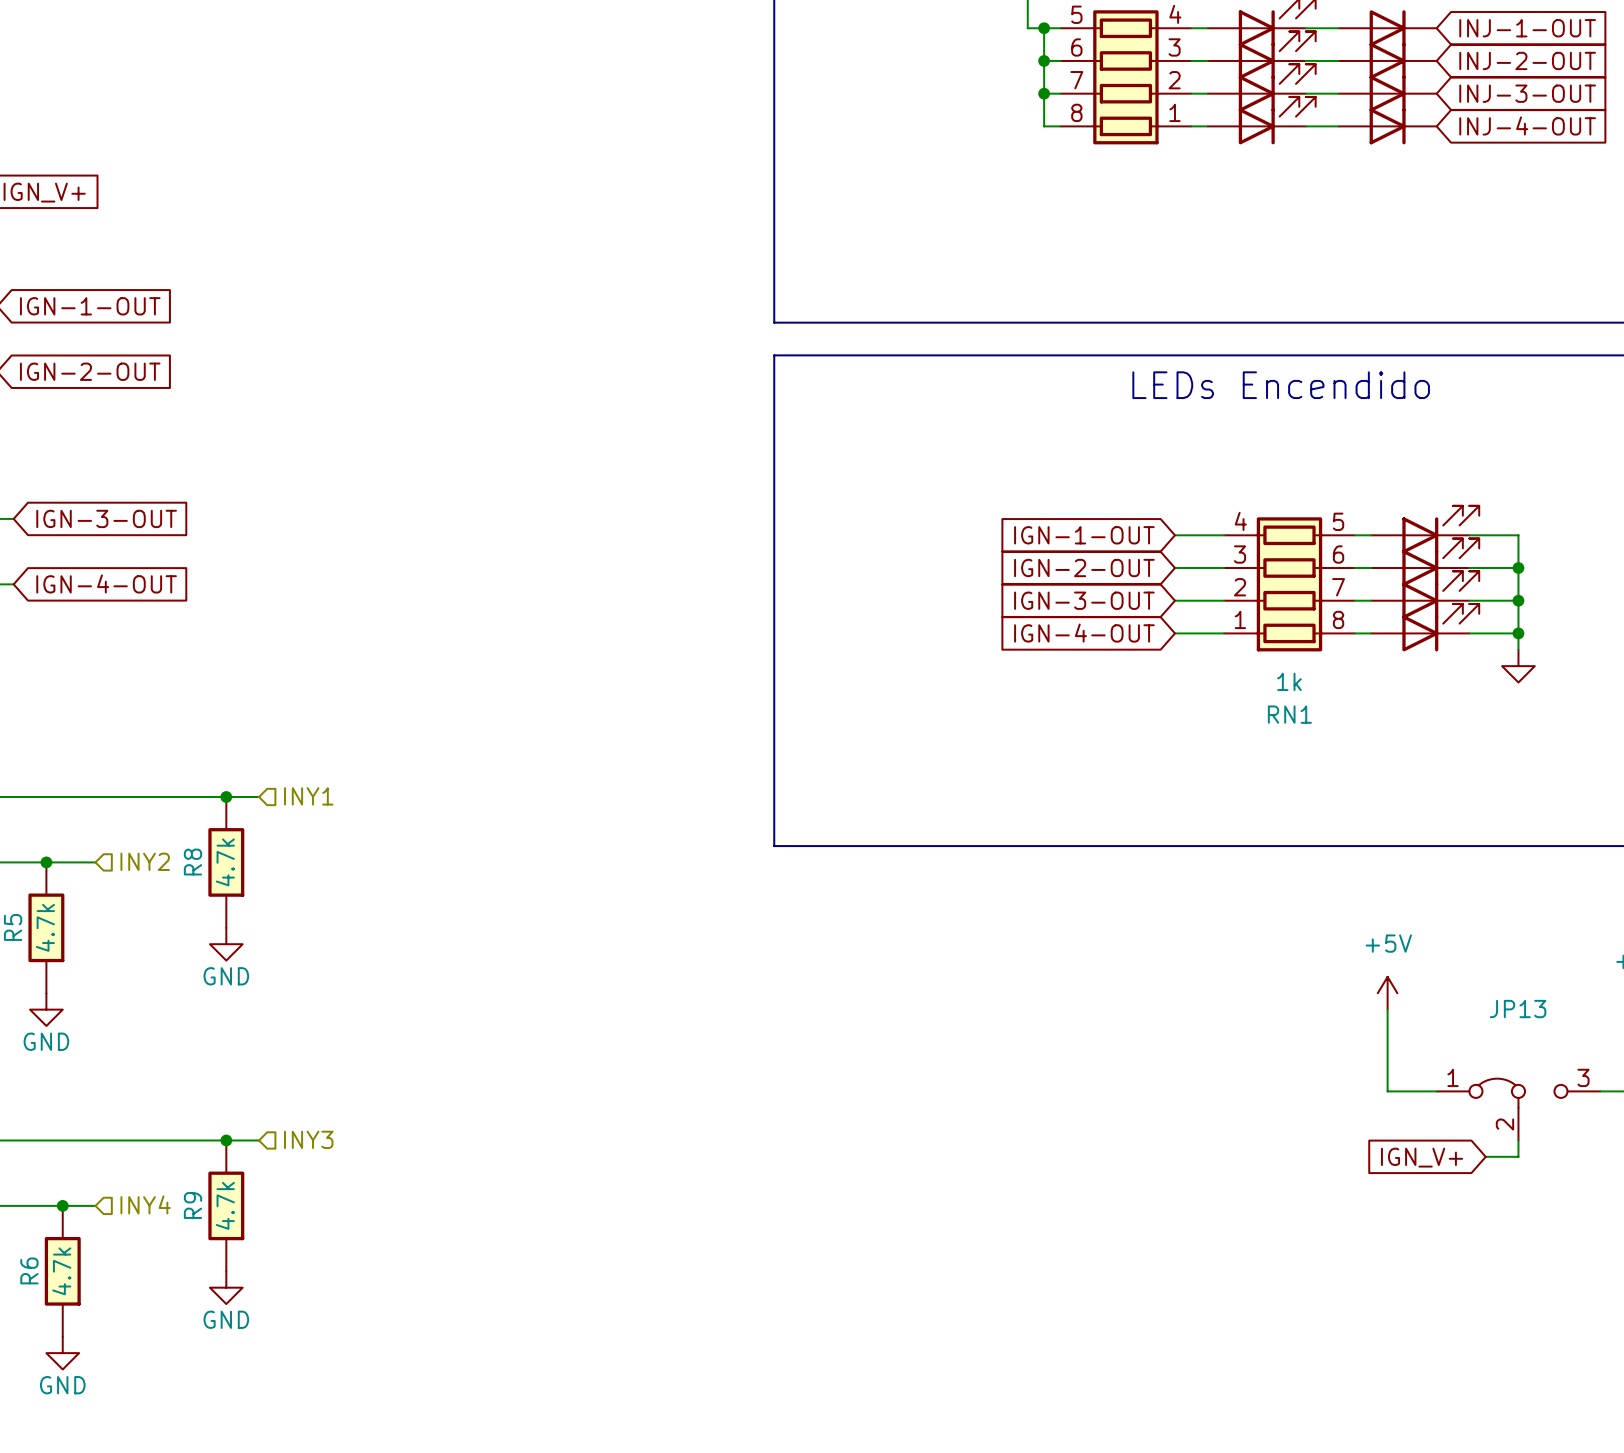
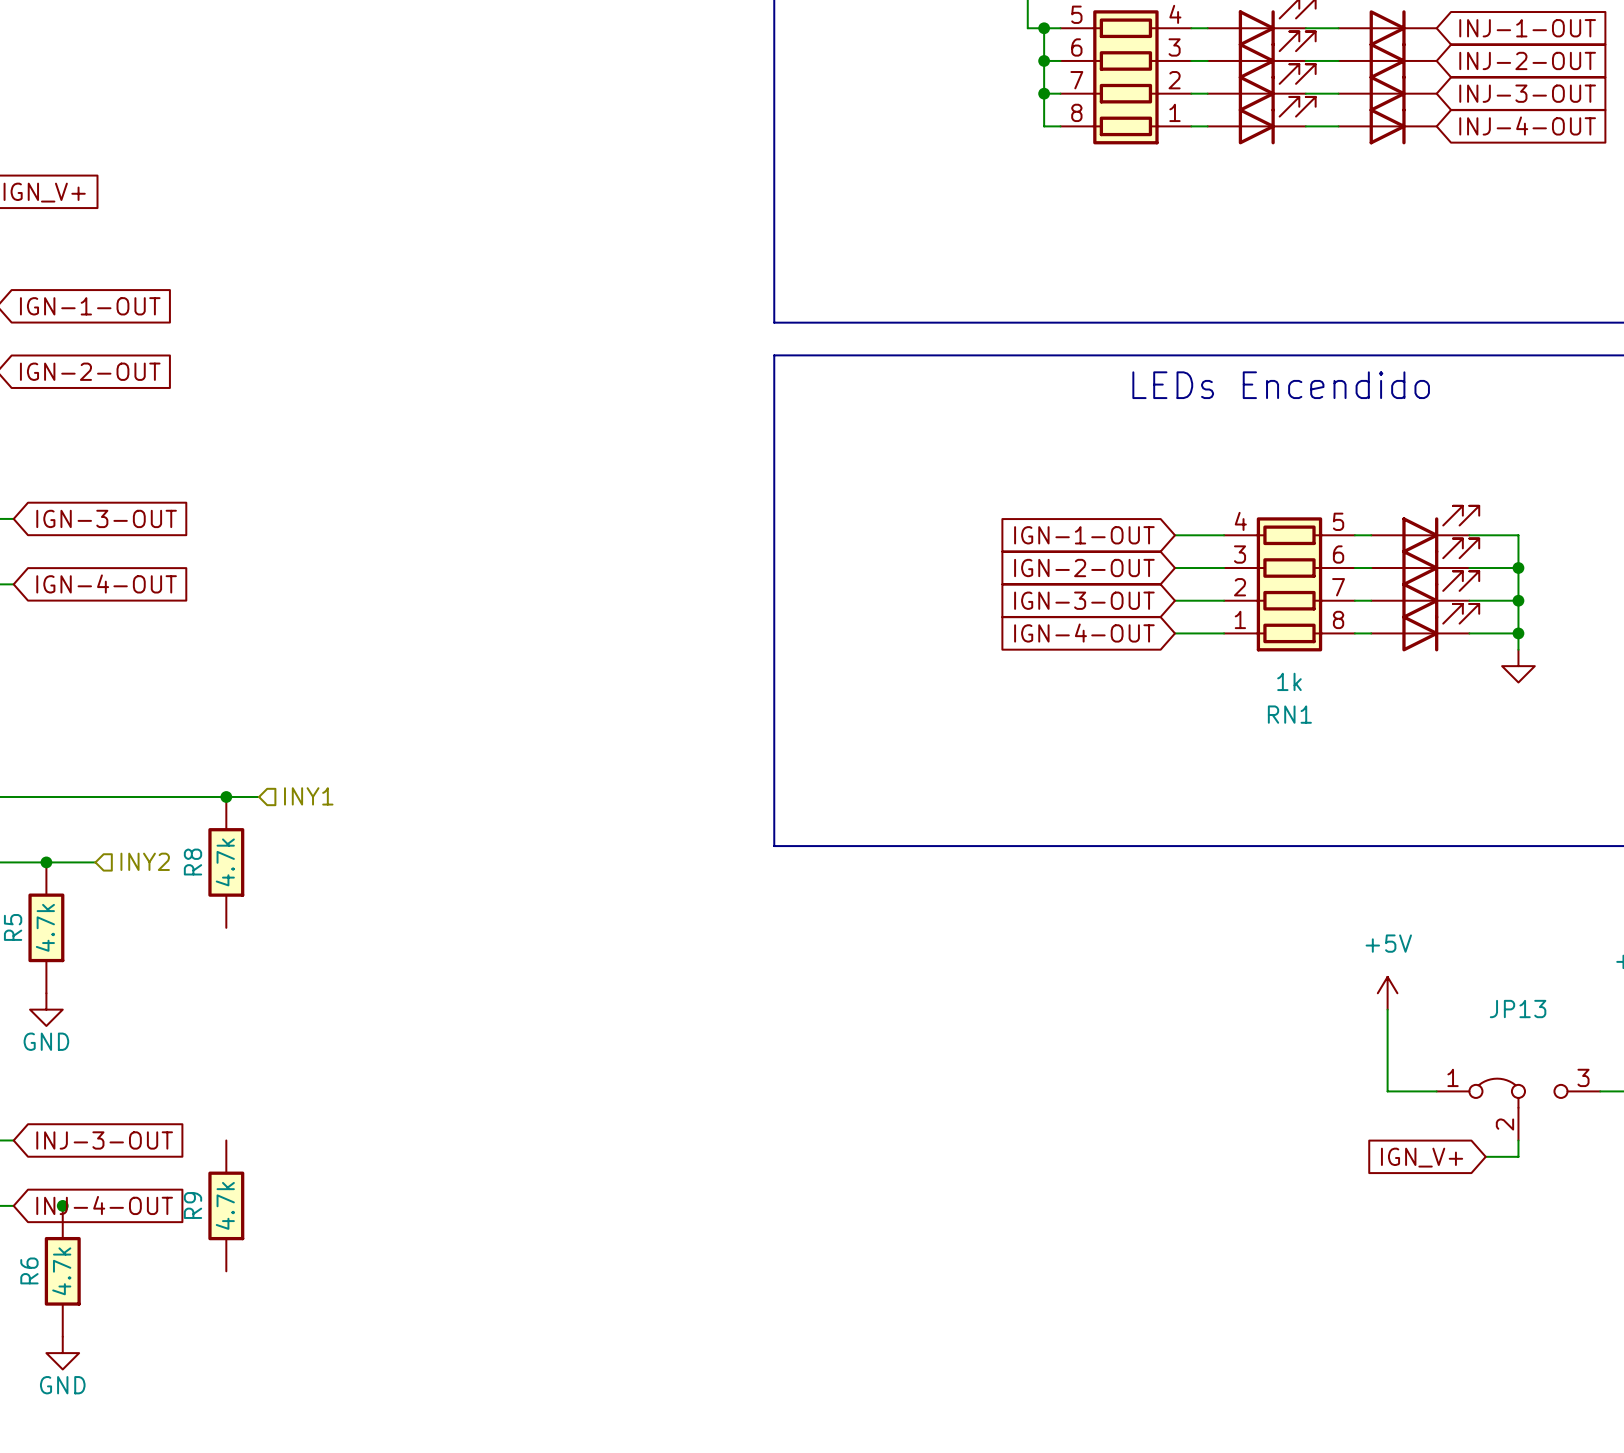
power symbol: GND (226, 944) -> none
hierarchical label: INY3 (308, 1139) -> none
wire: (13, 1140) (259, 1140) -> none
global label: none -> INJ-3-OUT (104, 1140)
junction: (226, 1140) -> none
hierarchical label: INY4 (145, 1204) -> none
wire: (13, 1205) (95, 1205) -> none
global label: none -> INJ-4-OUT (104, 1205)
power symbol: GND (226, 1287) -> none

